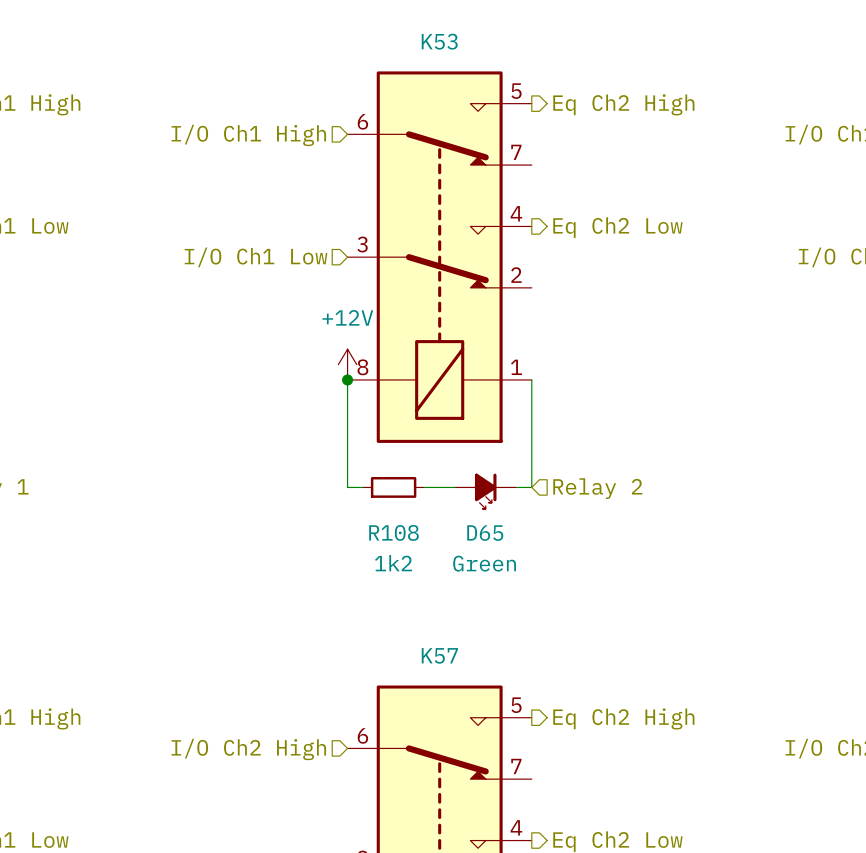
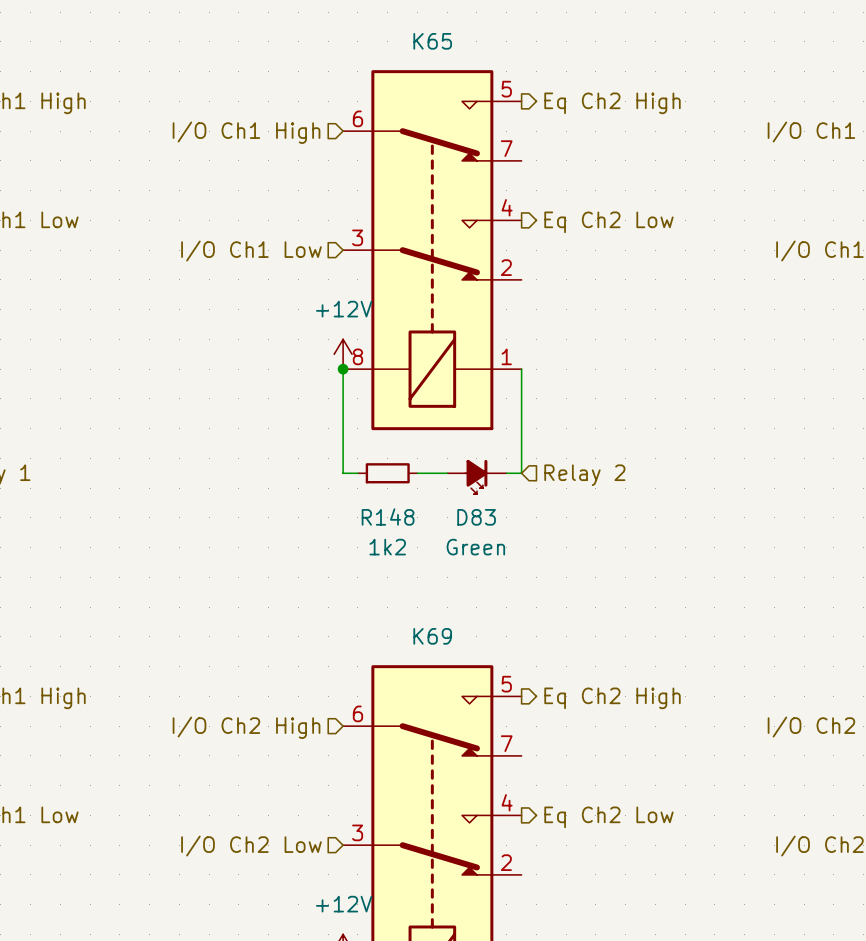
K53 name: K53 (439, 41) -> K65 (432, 41)
R108 name: R108 (394, 532) -> R148 (388, 516)
D65 name: D65 (485, 533) -> D83 (476, 517)
K57 name: K57 (439, 655) -> K69 (432, 636)

